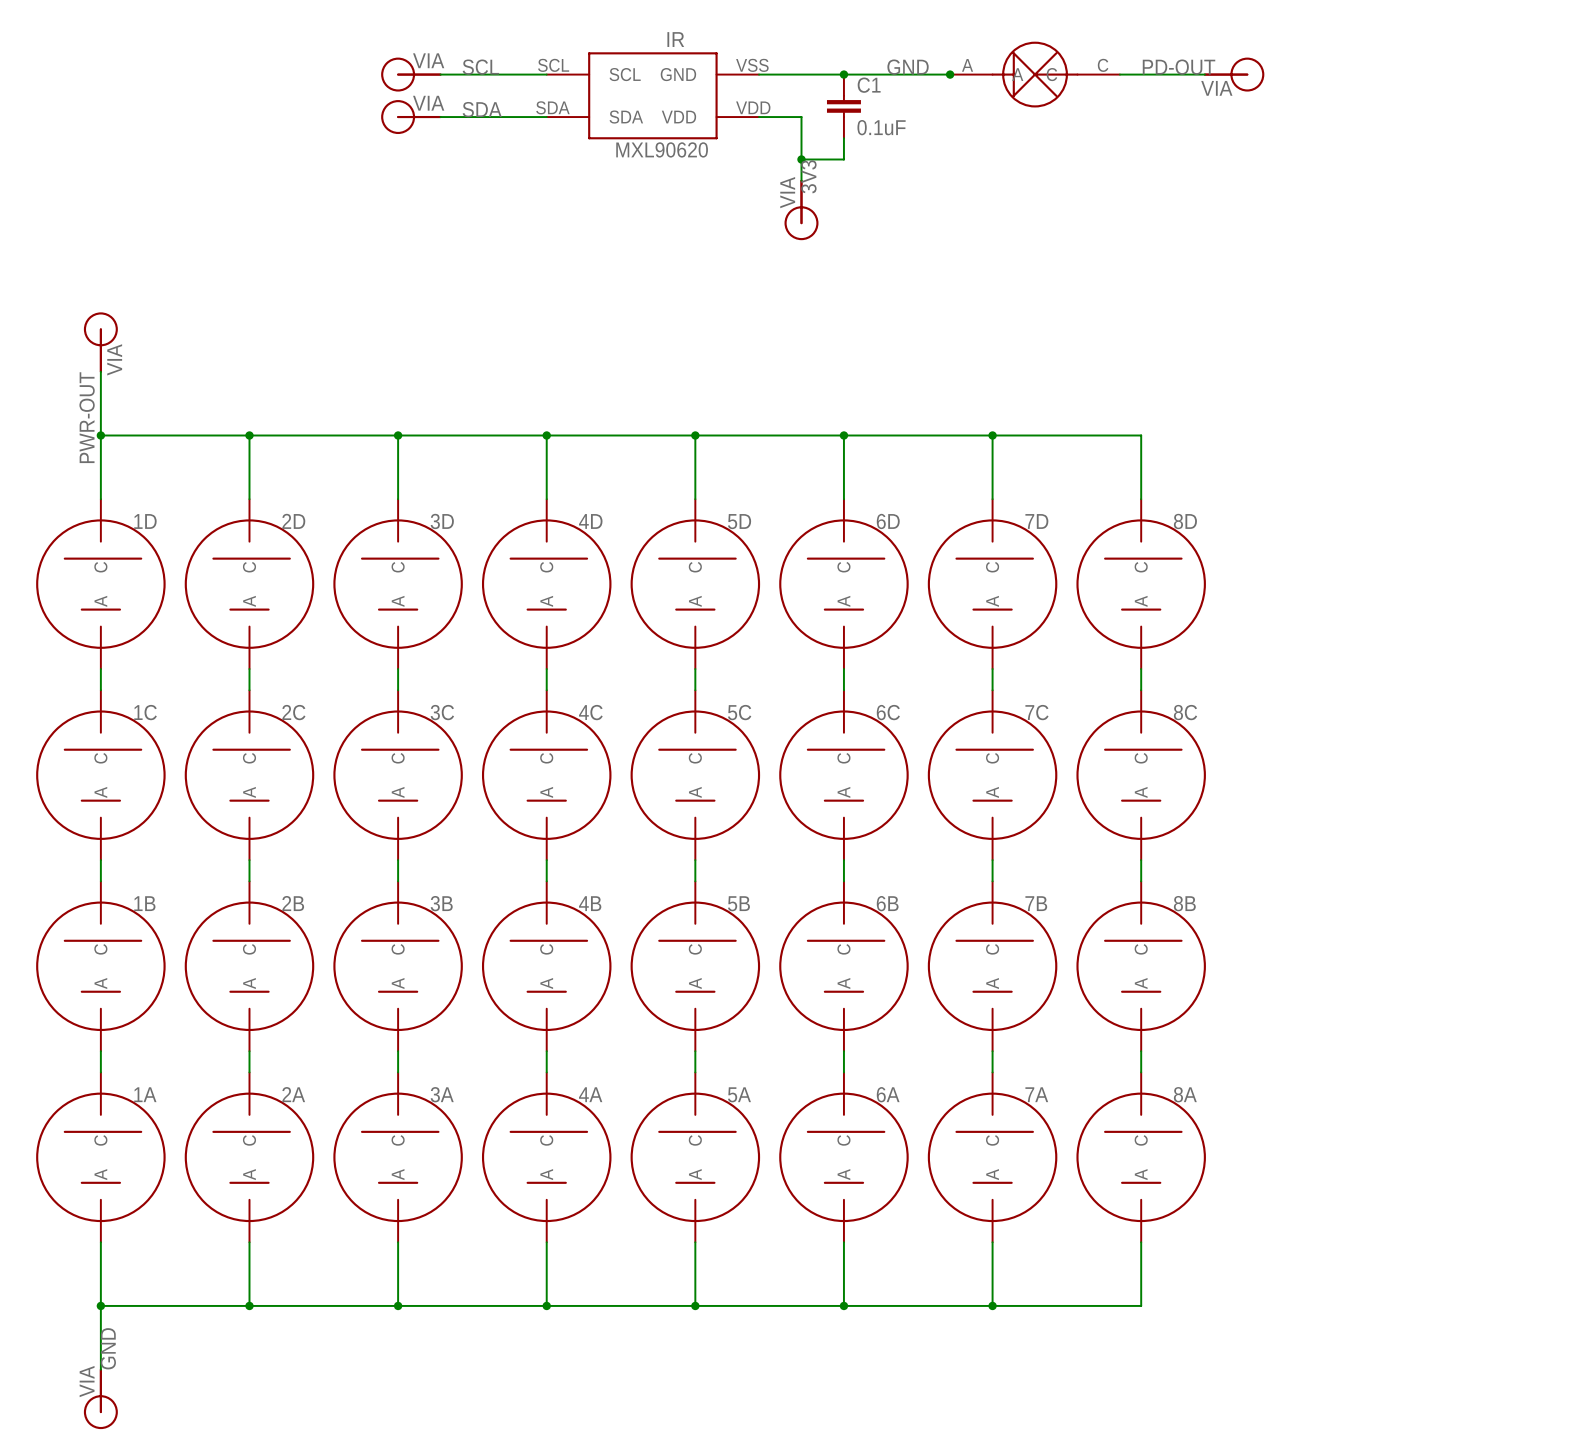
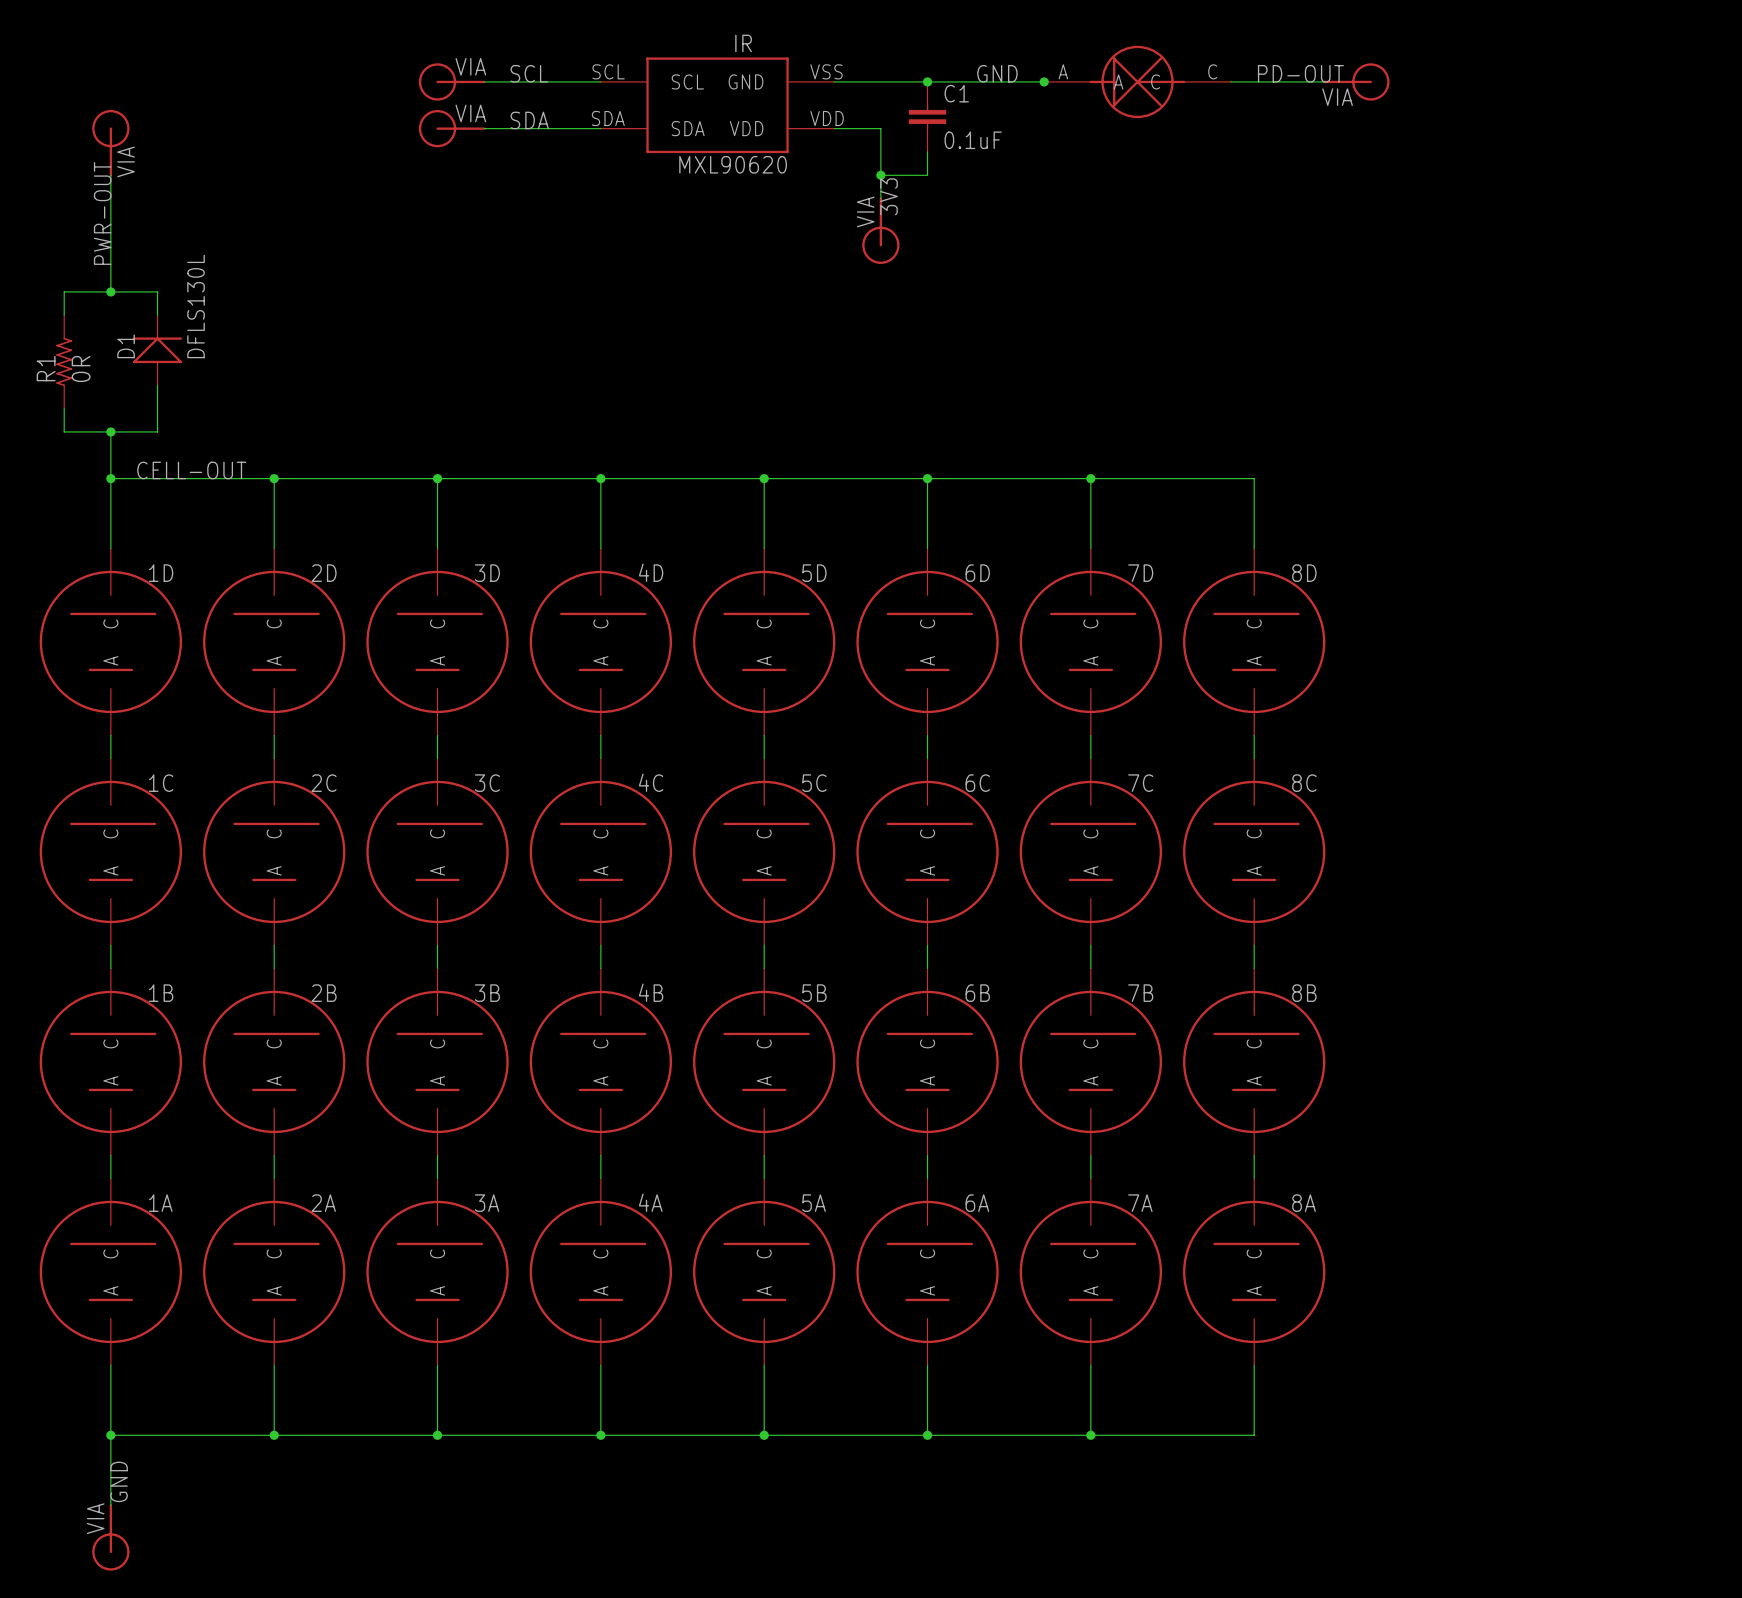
part: none -> (110, 143)
wire: none -> (110, 175) (110, 291)
junction: none -> (110, 291)
wire: none -> (64, 315) (64, 291) (157, 291) (157, 315)
D1: none -> DFLS130L (157, 350)
R1: none -> 0R (64, 361)
part: (100, 342) -> none
wire: none -> (157, 385) (157, 431) (64, 431) (64, 408)
wire: (100, 371) (100, 393) -> none
junction: none -> (110, 431)
label position: PWR-OUT (87, 417) -> PWR-OUT (102, 213)
label: none -> CELL-OUT (191, 470)

